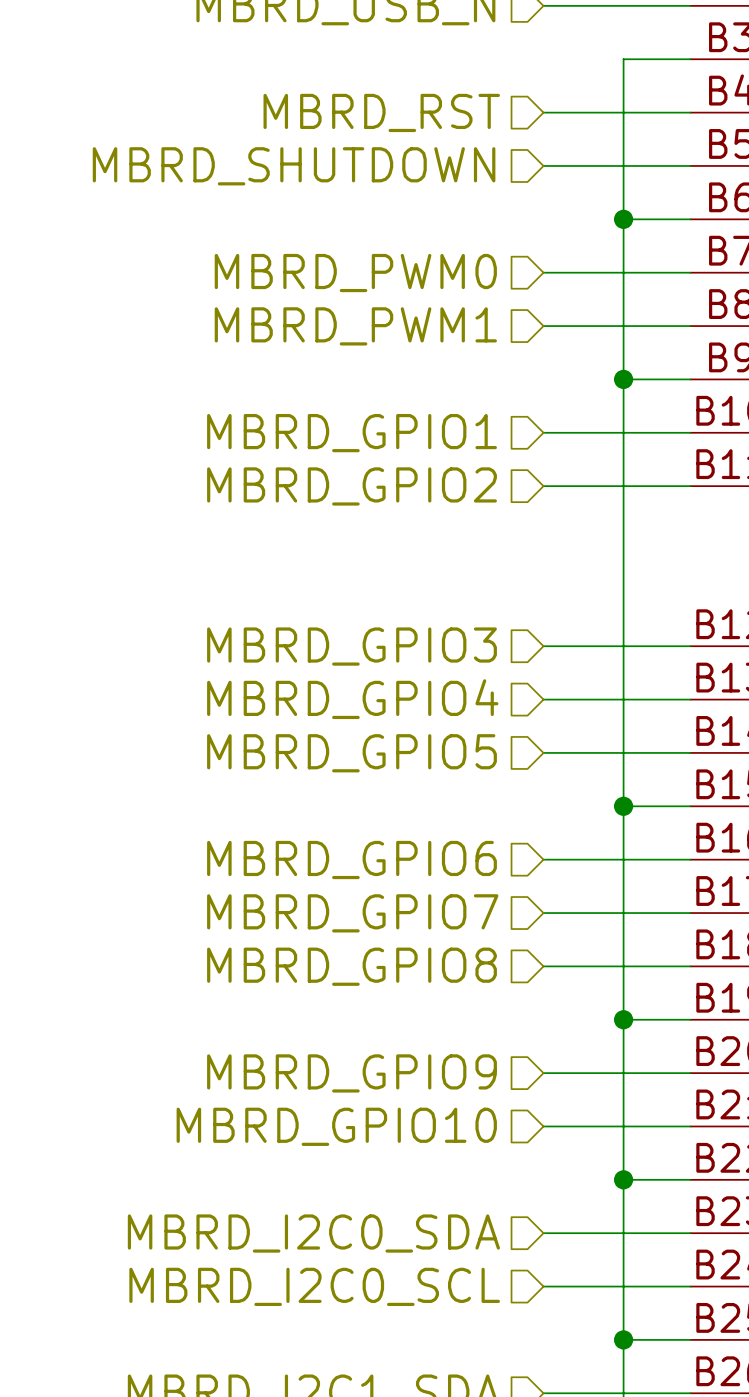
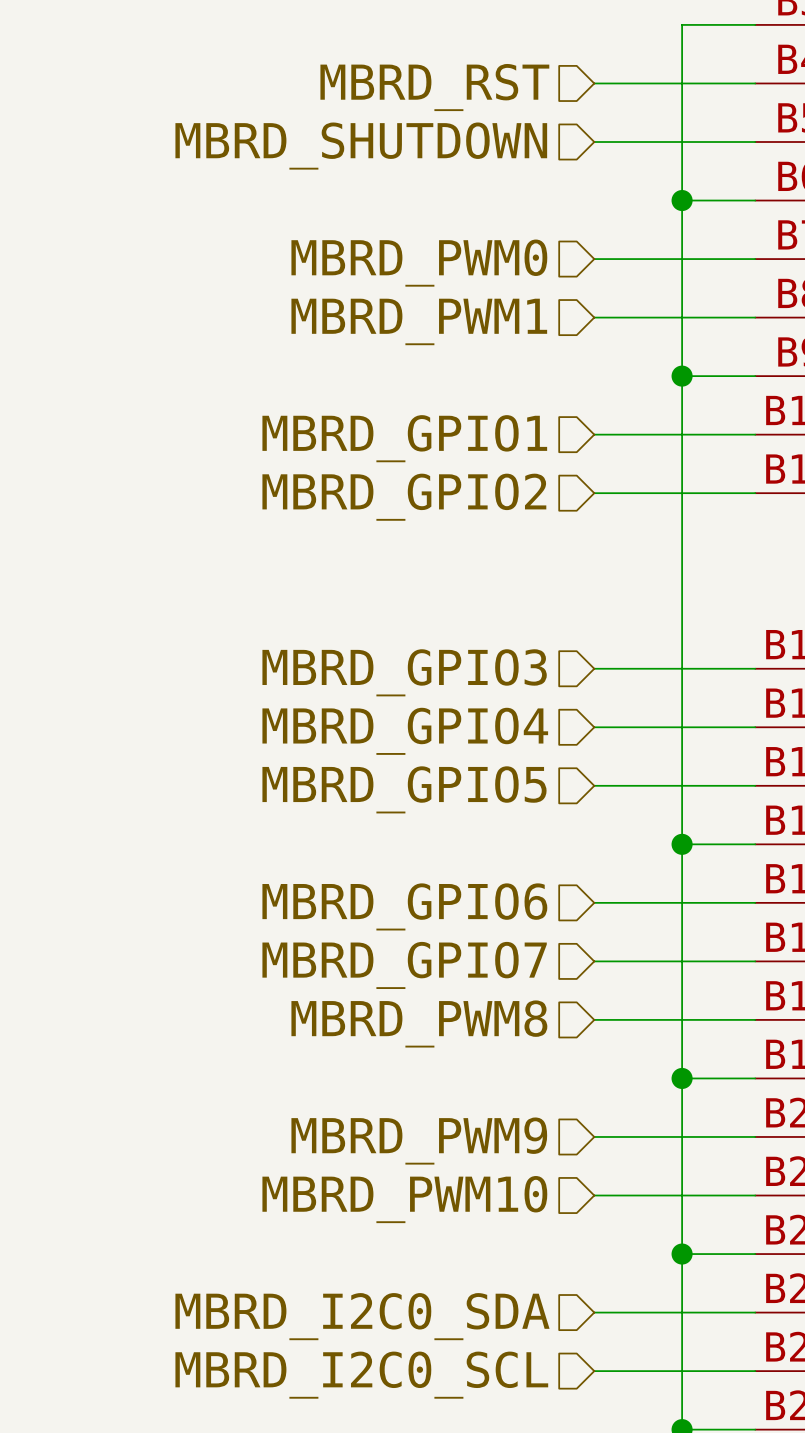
hierarchical label: MBRD_GPIO8 (352, 966) -> MBRD_PWM8 (419, 1023)
hierarchical label: MBRD_GPIO9 (352, 1073) -> MBRD_PWM9 (419, 1141)
hierarchical label: MBRD_GPIO10 (336, 1126) -> MBRD_PWM10 (404, 1199)

